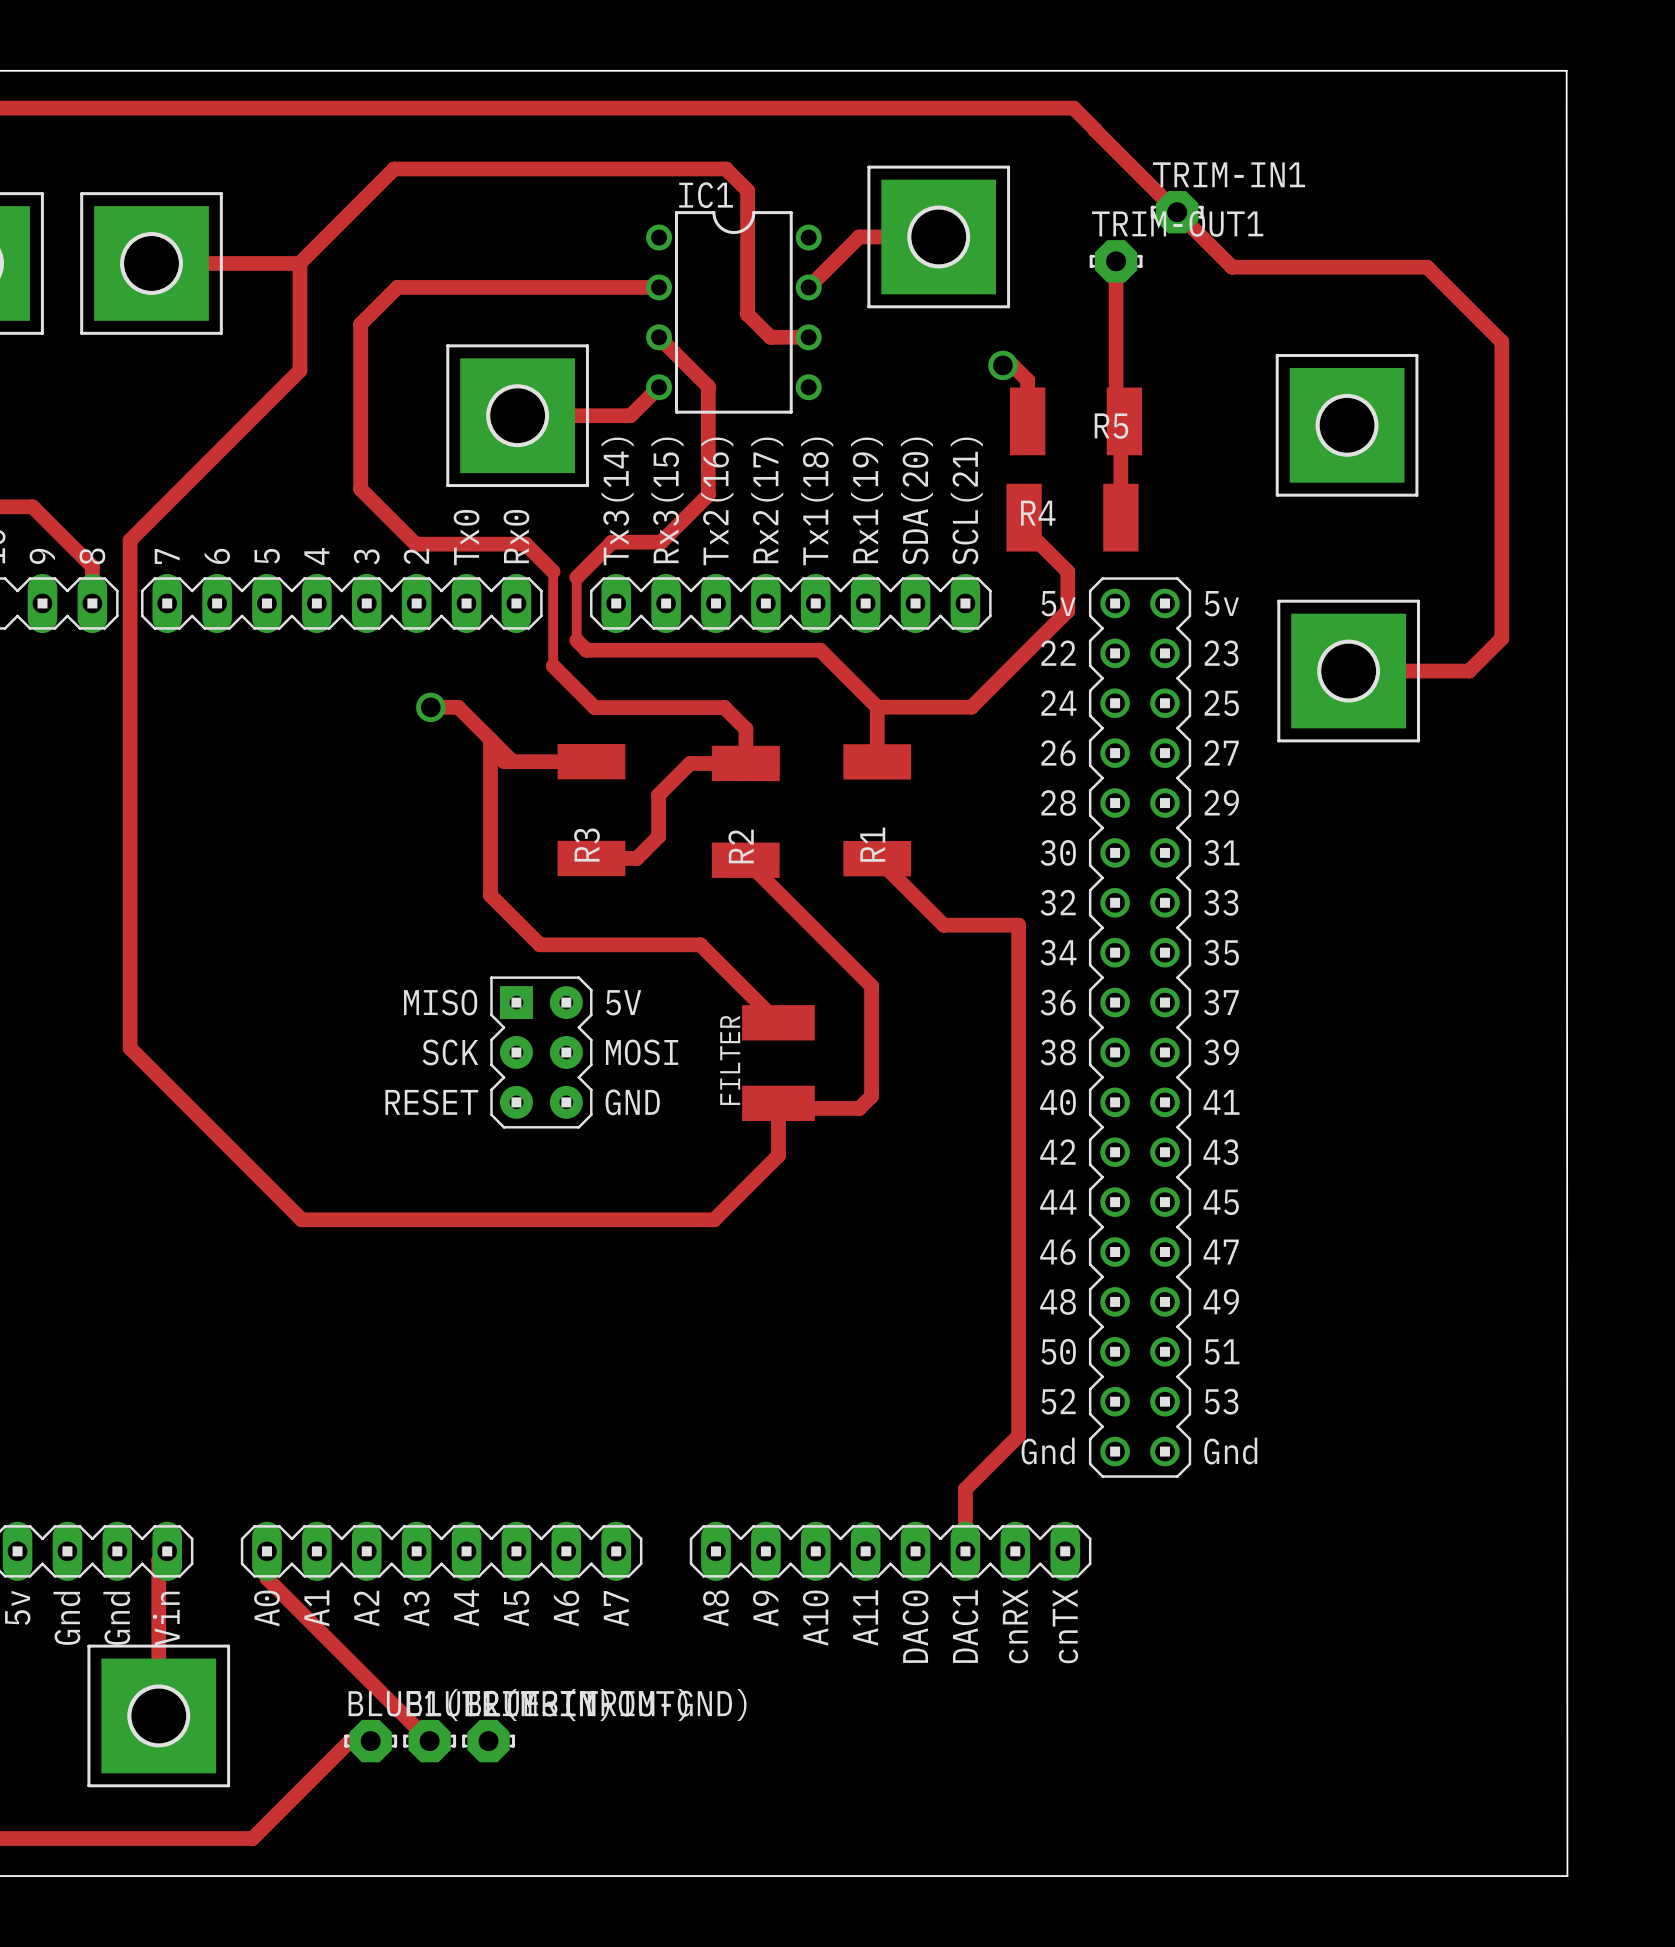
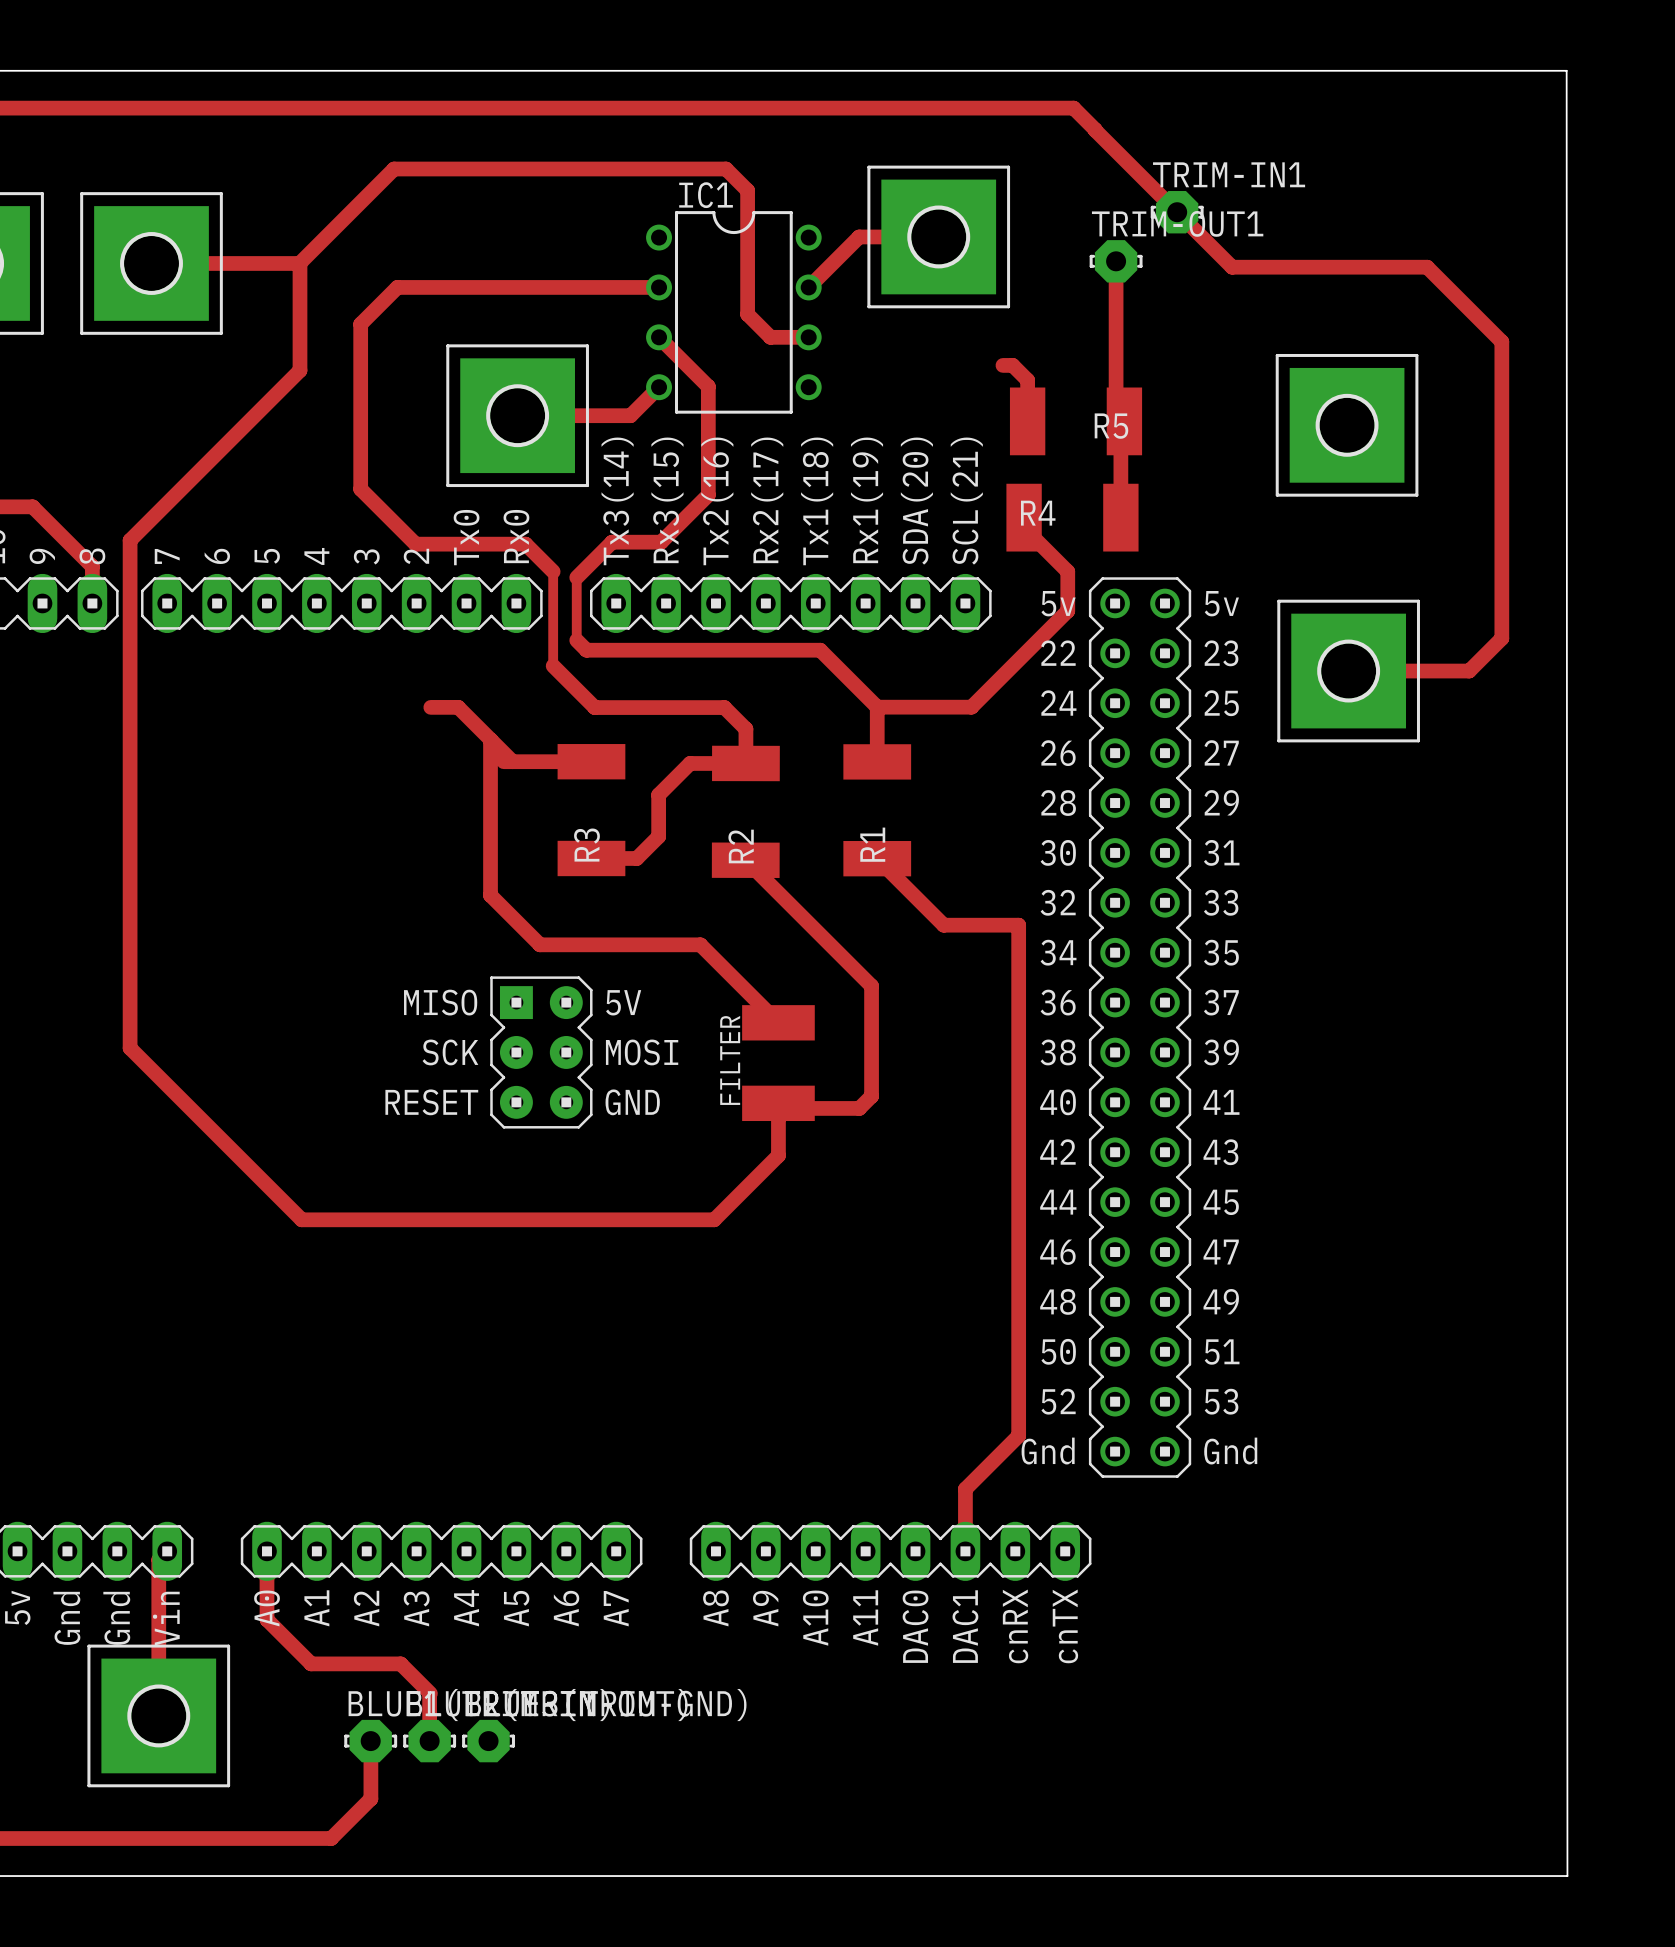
via: (1002, 365) -> none
via: (430, 707) -> none
track: (266, 1578) (429, 1741) -> (266, 1578) (266, 1619) (311, 1663) (400, 1663) (430, 1693) (429, 1741)
track: (370, 1741) (350, 1741) (252, 1838) -> (370, 1741) (370, 1798) (331, 1838) (252, 1838)

